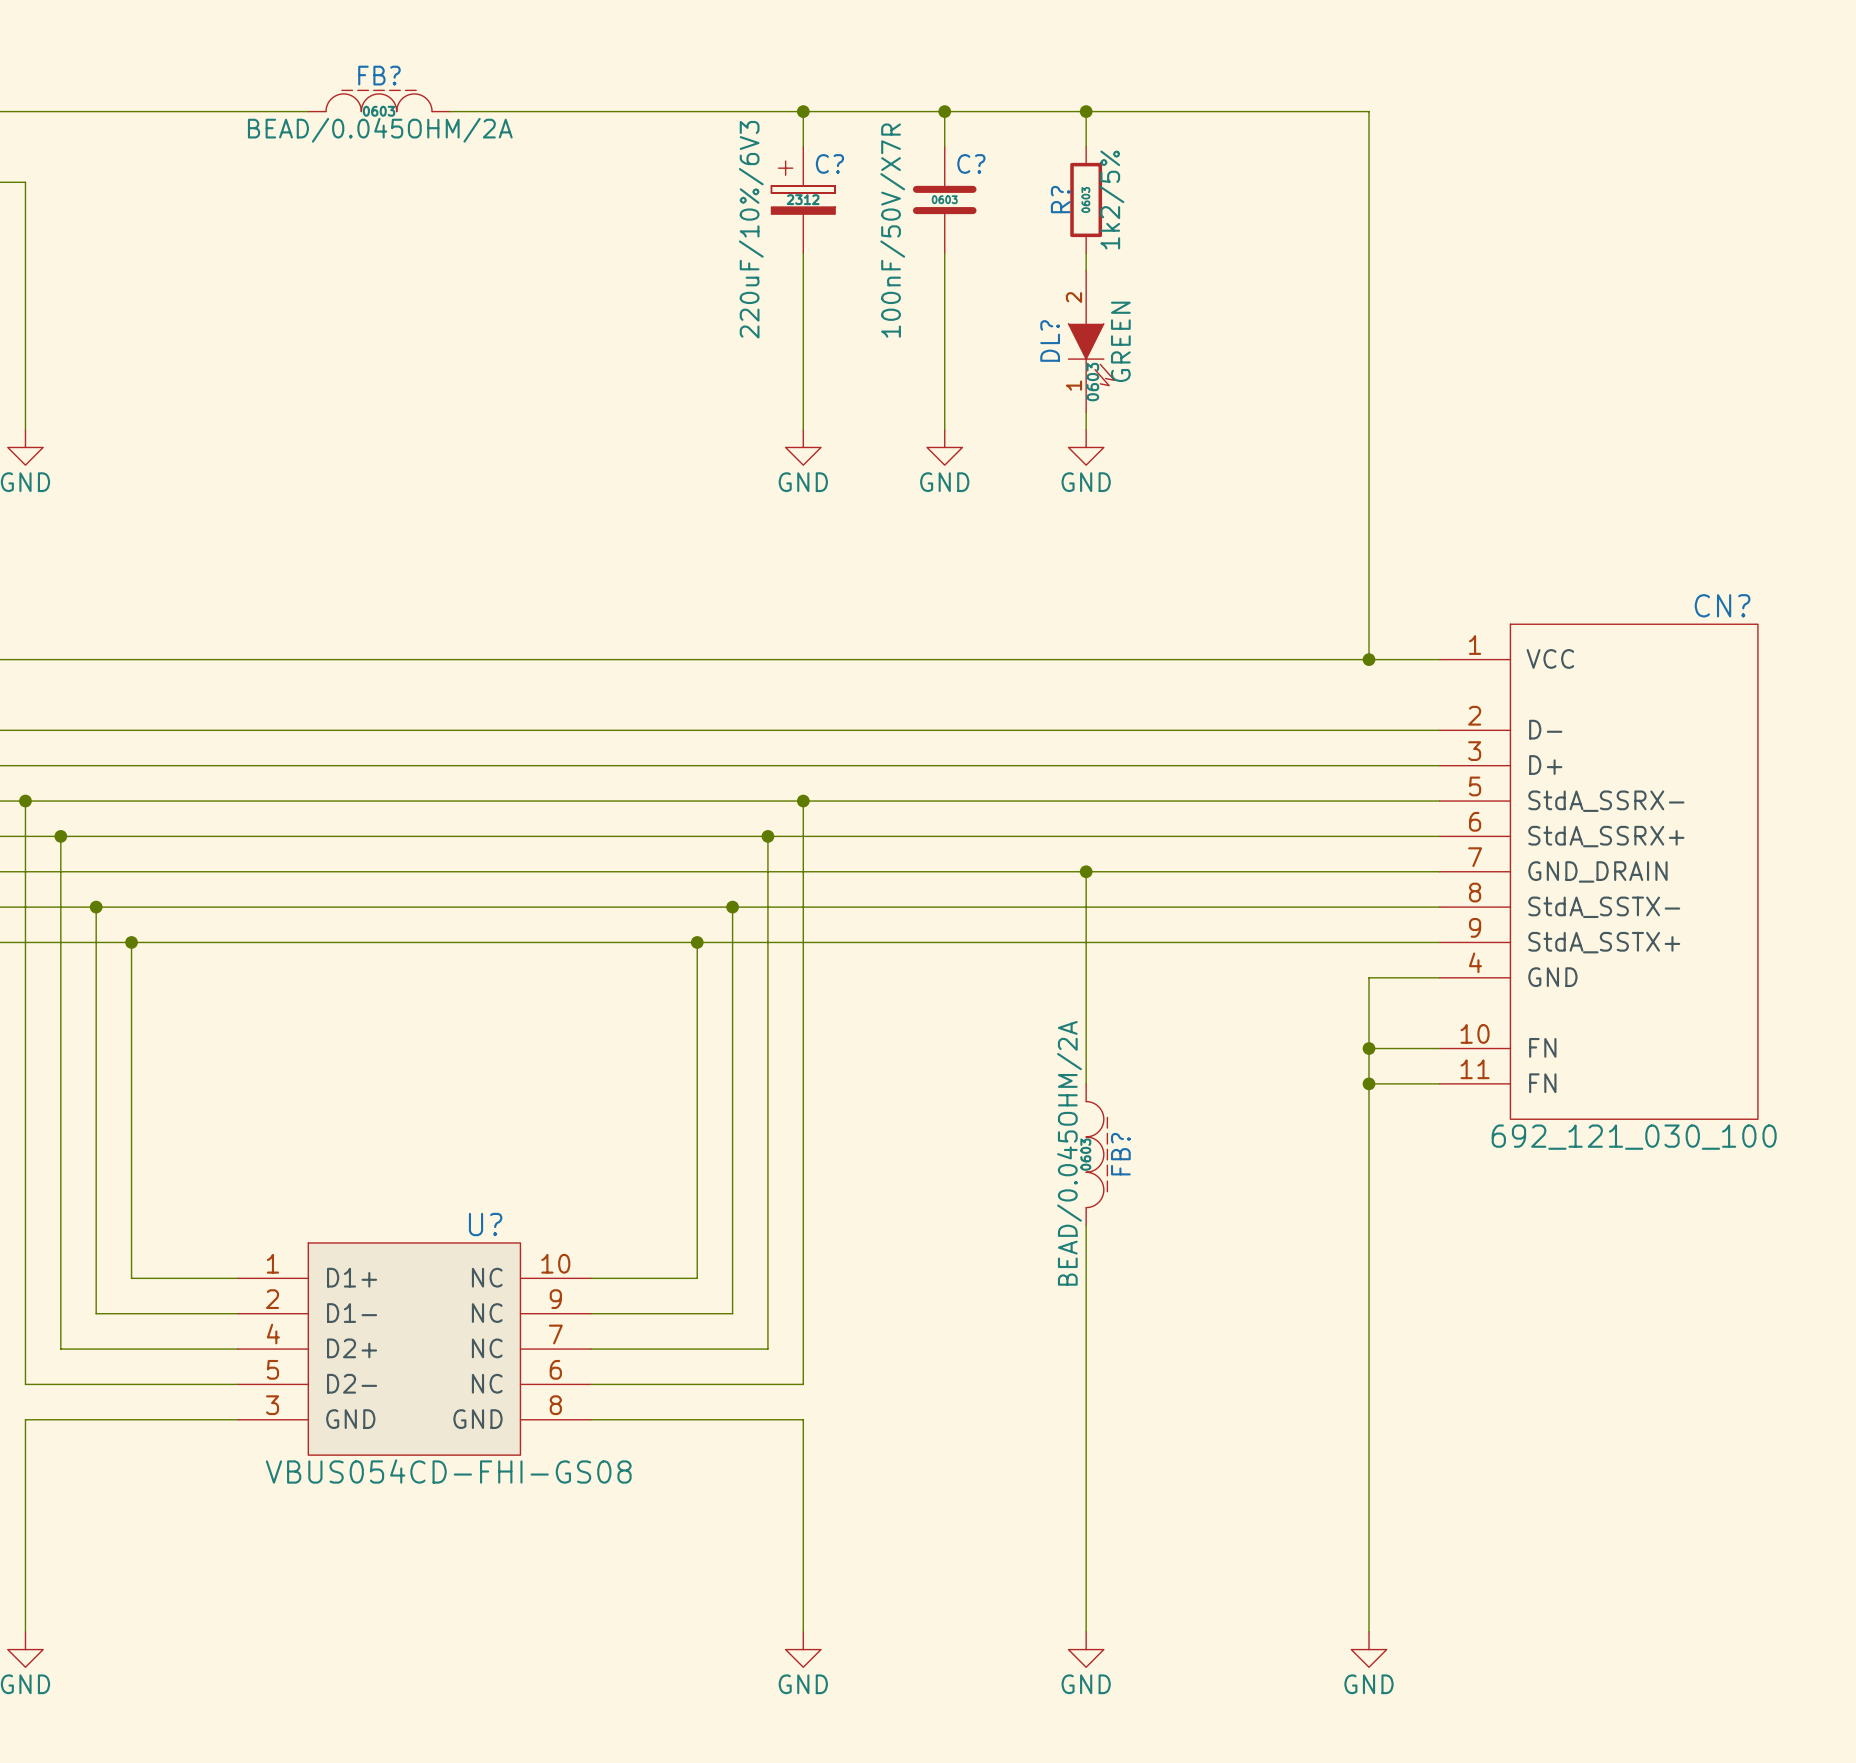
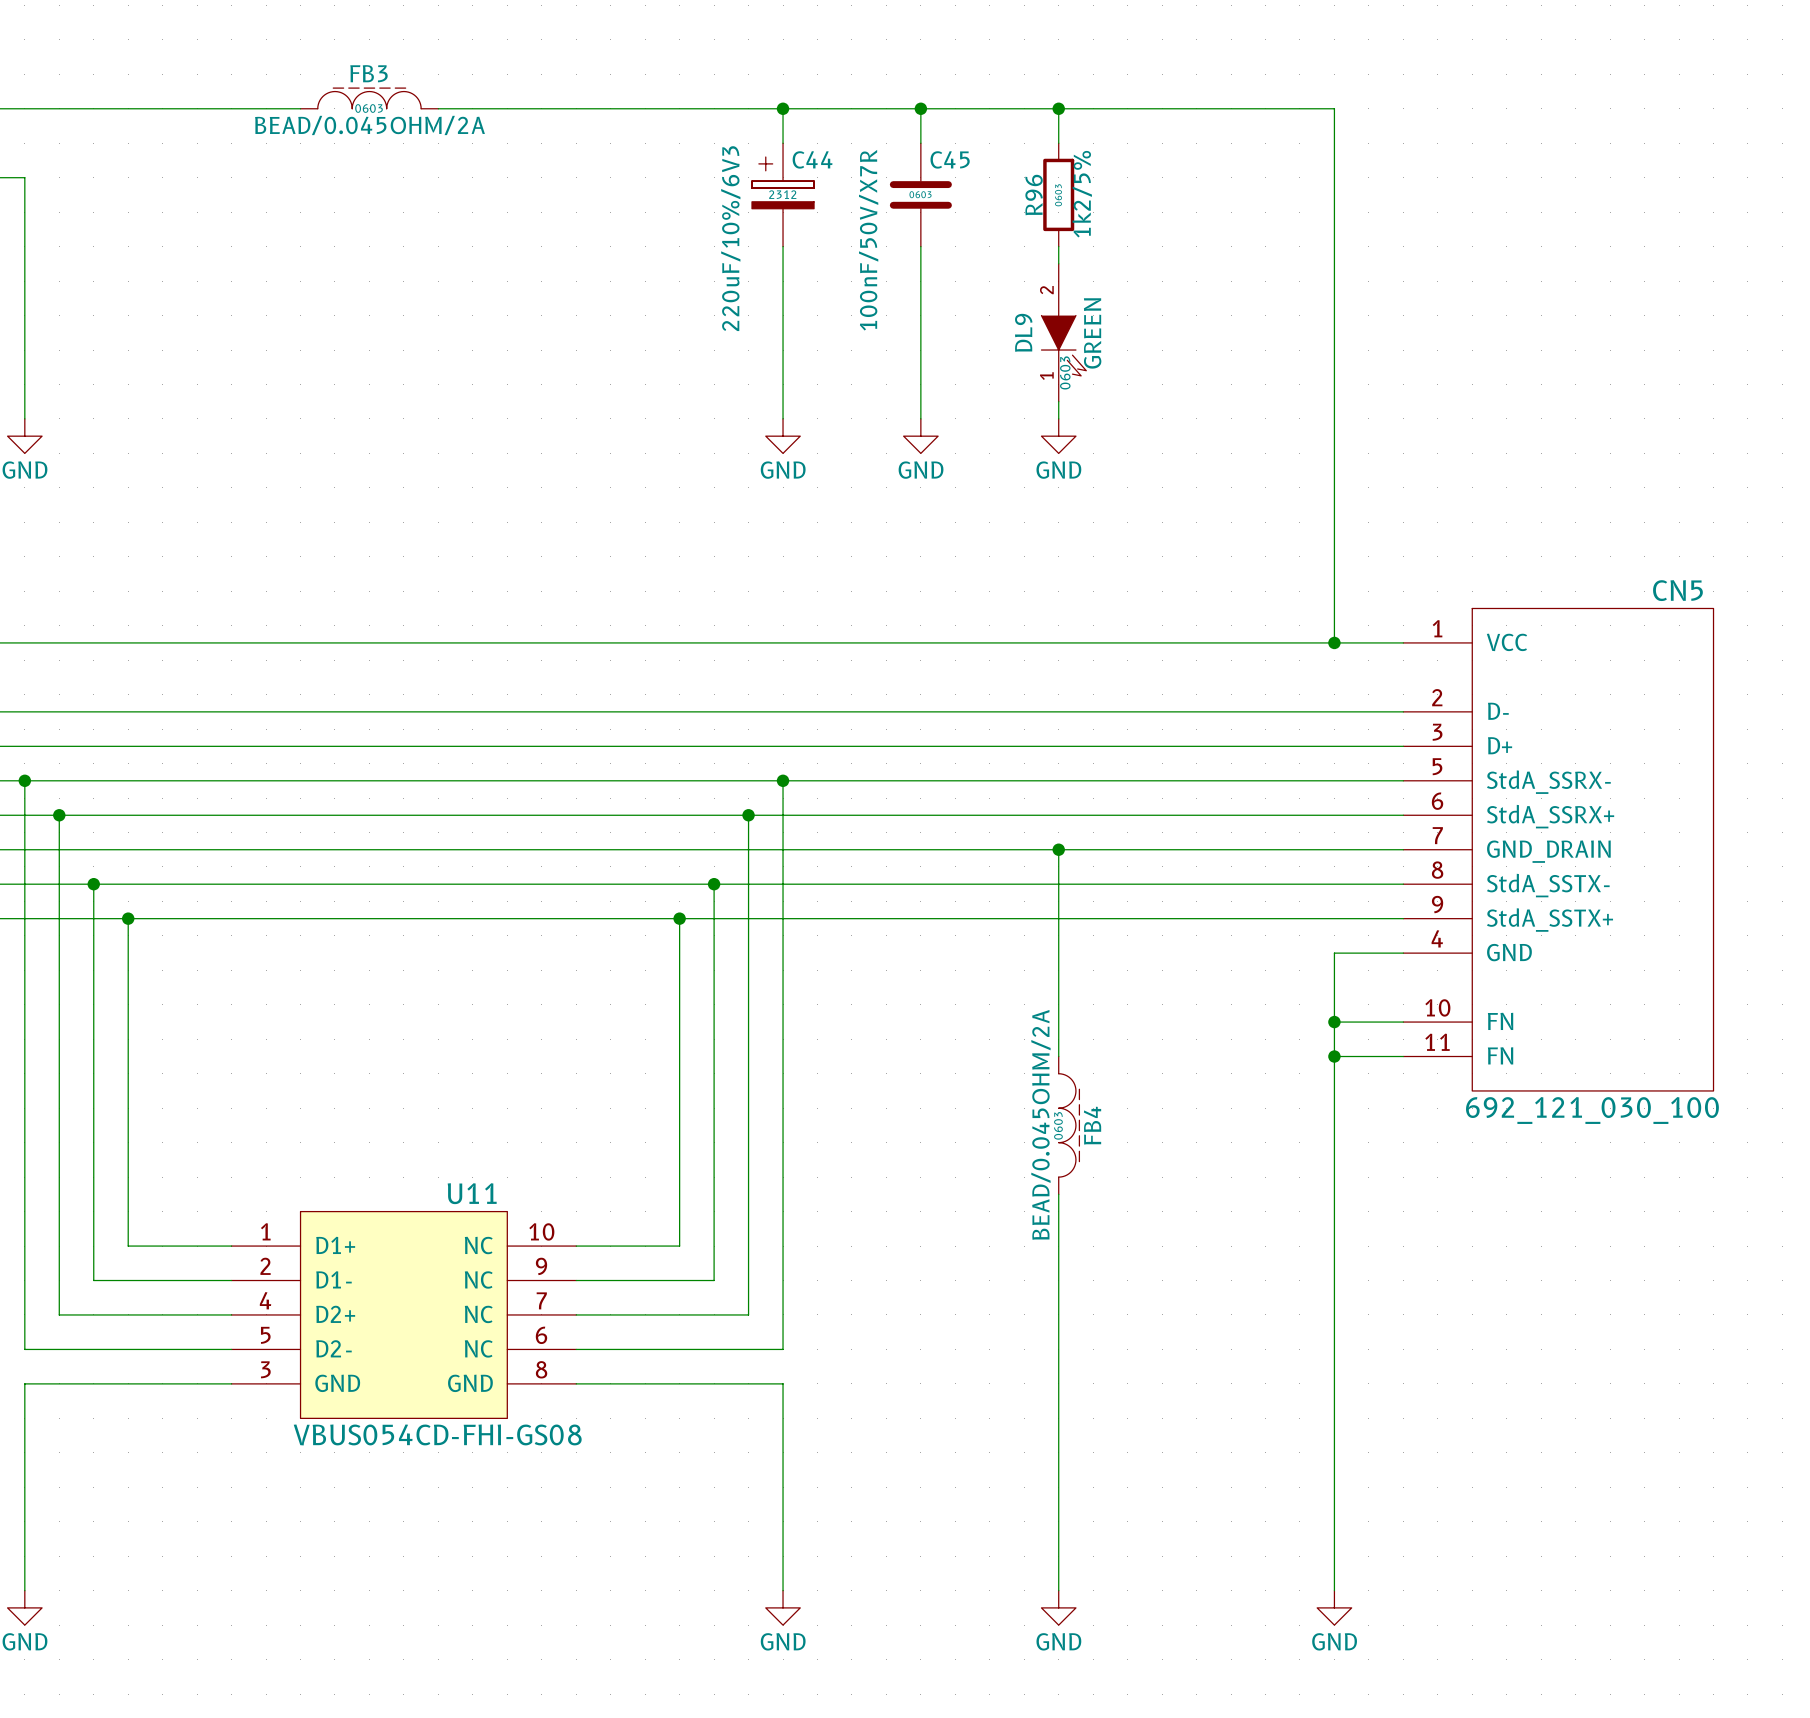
FB? name: FB? (379, 75) -> FB3 (368, 73)
C? name: C? (829, 163) -> C44 (812, 159)
C? name: C? (971, 163) -> C45 (950, 159)
R? name: R? (1060, 199) -> R96 (1034, 195)
DL? name: DL? (1050, 340) -> DL9 (1023, 332)
CN? name: CN? (1722, 605) -> CN5 (1677, 590)
FB? name: FB? (1120, 1154) -> FB4 (1092, 1125)
U? name: U? (485, 1224) -> U11 (472, 1193)

